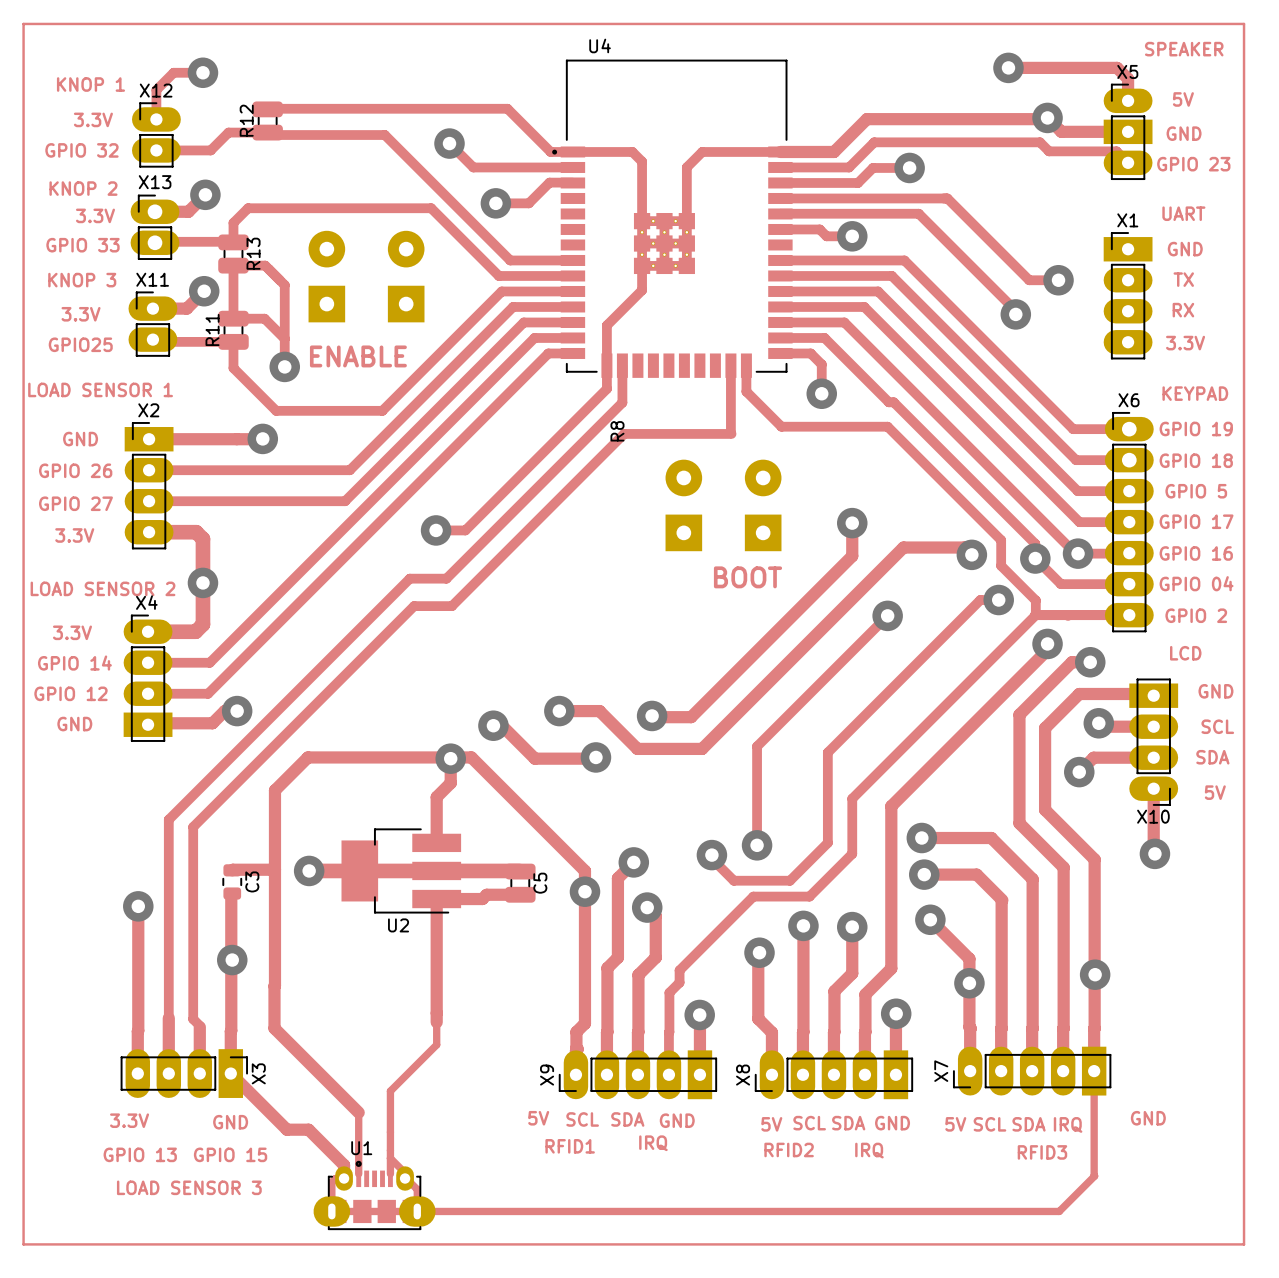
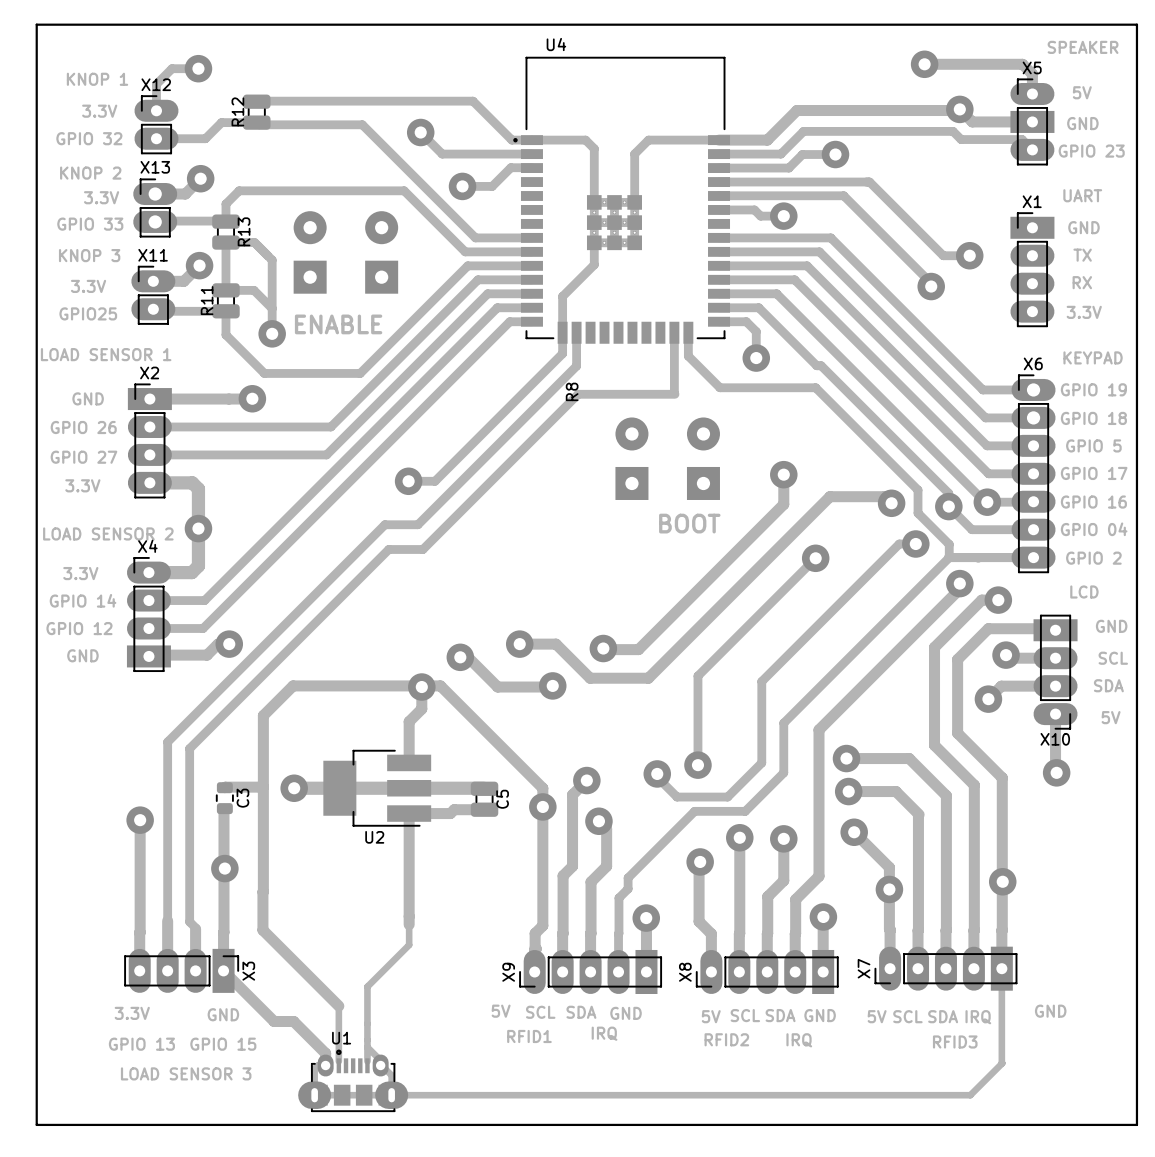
track: (23, 23) (1244, 23) (1244, 1244) (23, 1244) (23, 23) -> none
board edge: none -> (36, 24) (1136, 24) (1136, 1124) (36, 1124) (36, 24)

